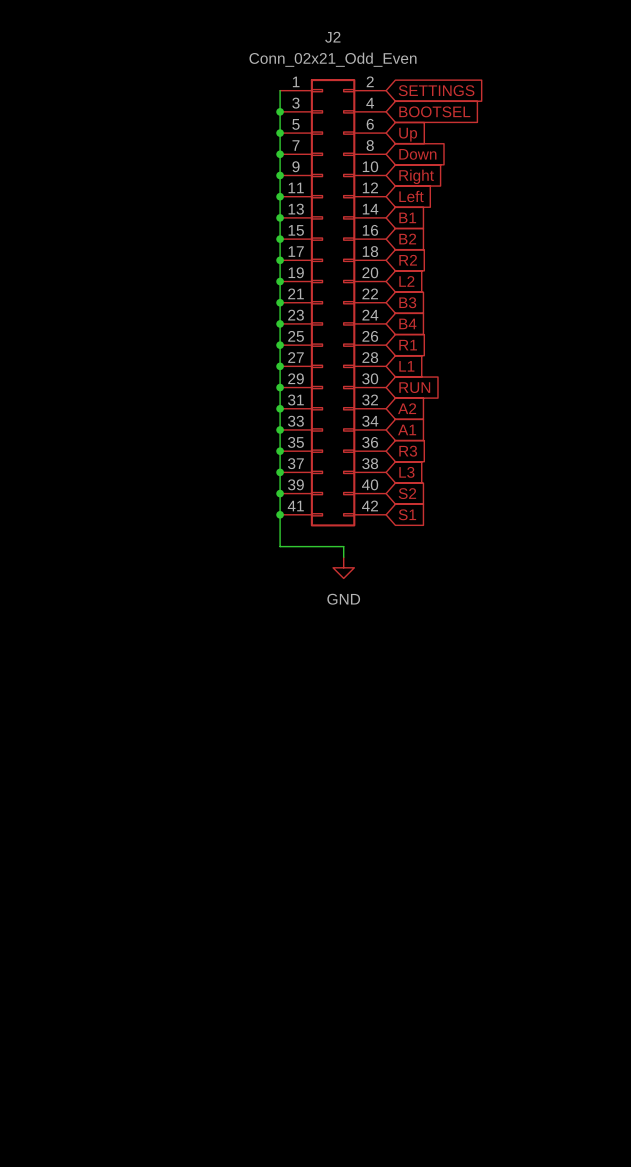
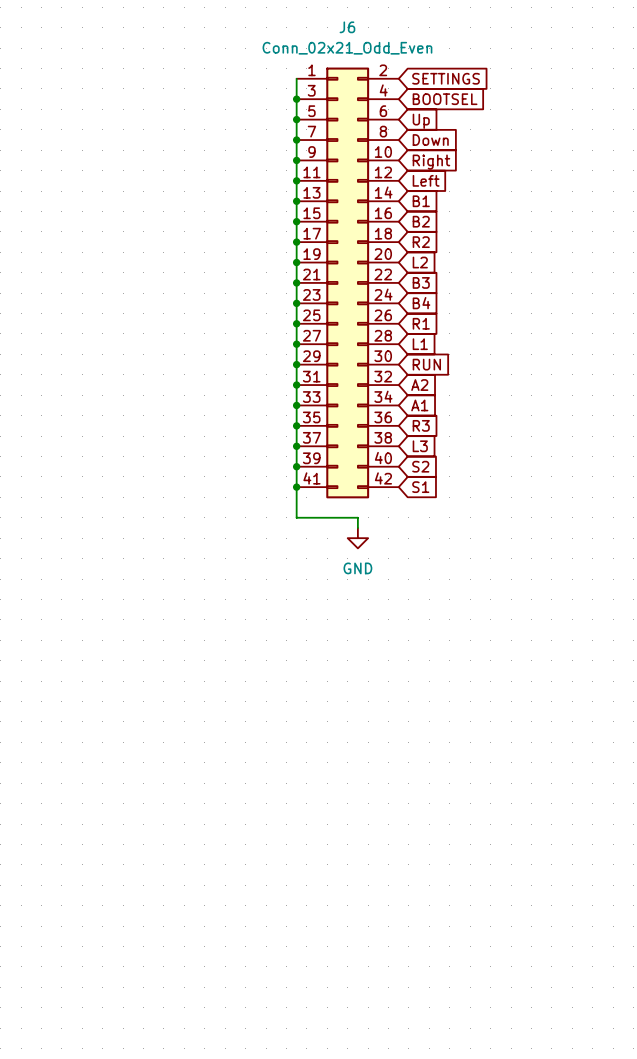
J2 name: J2 (332, 37) -> J6 (347, 27)

